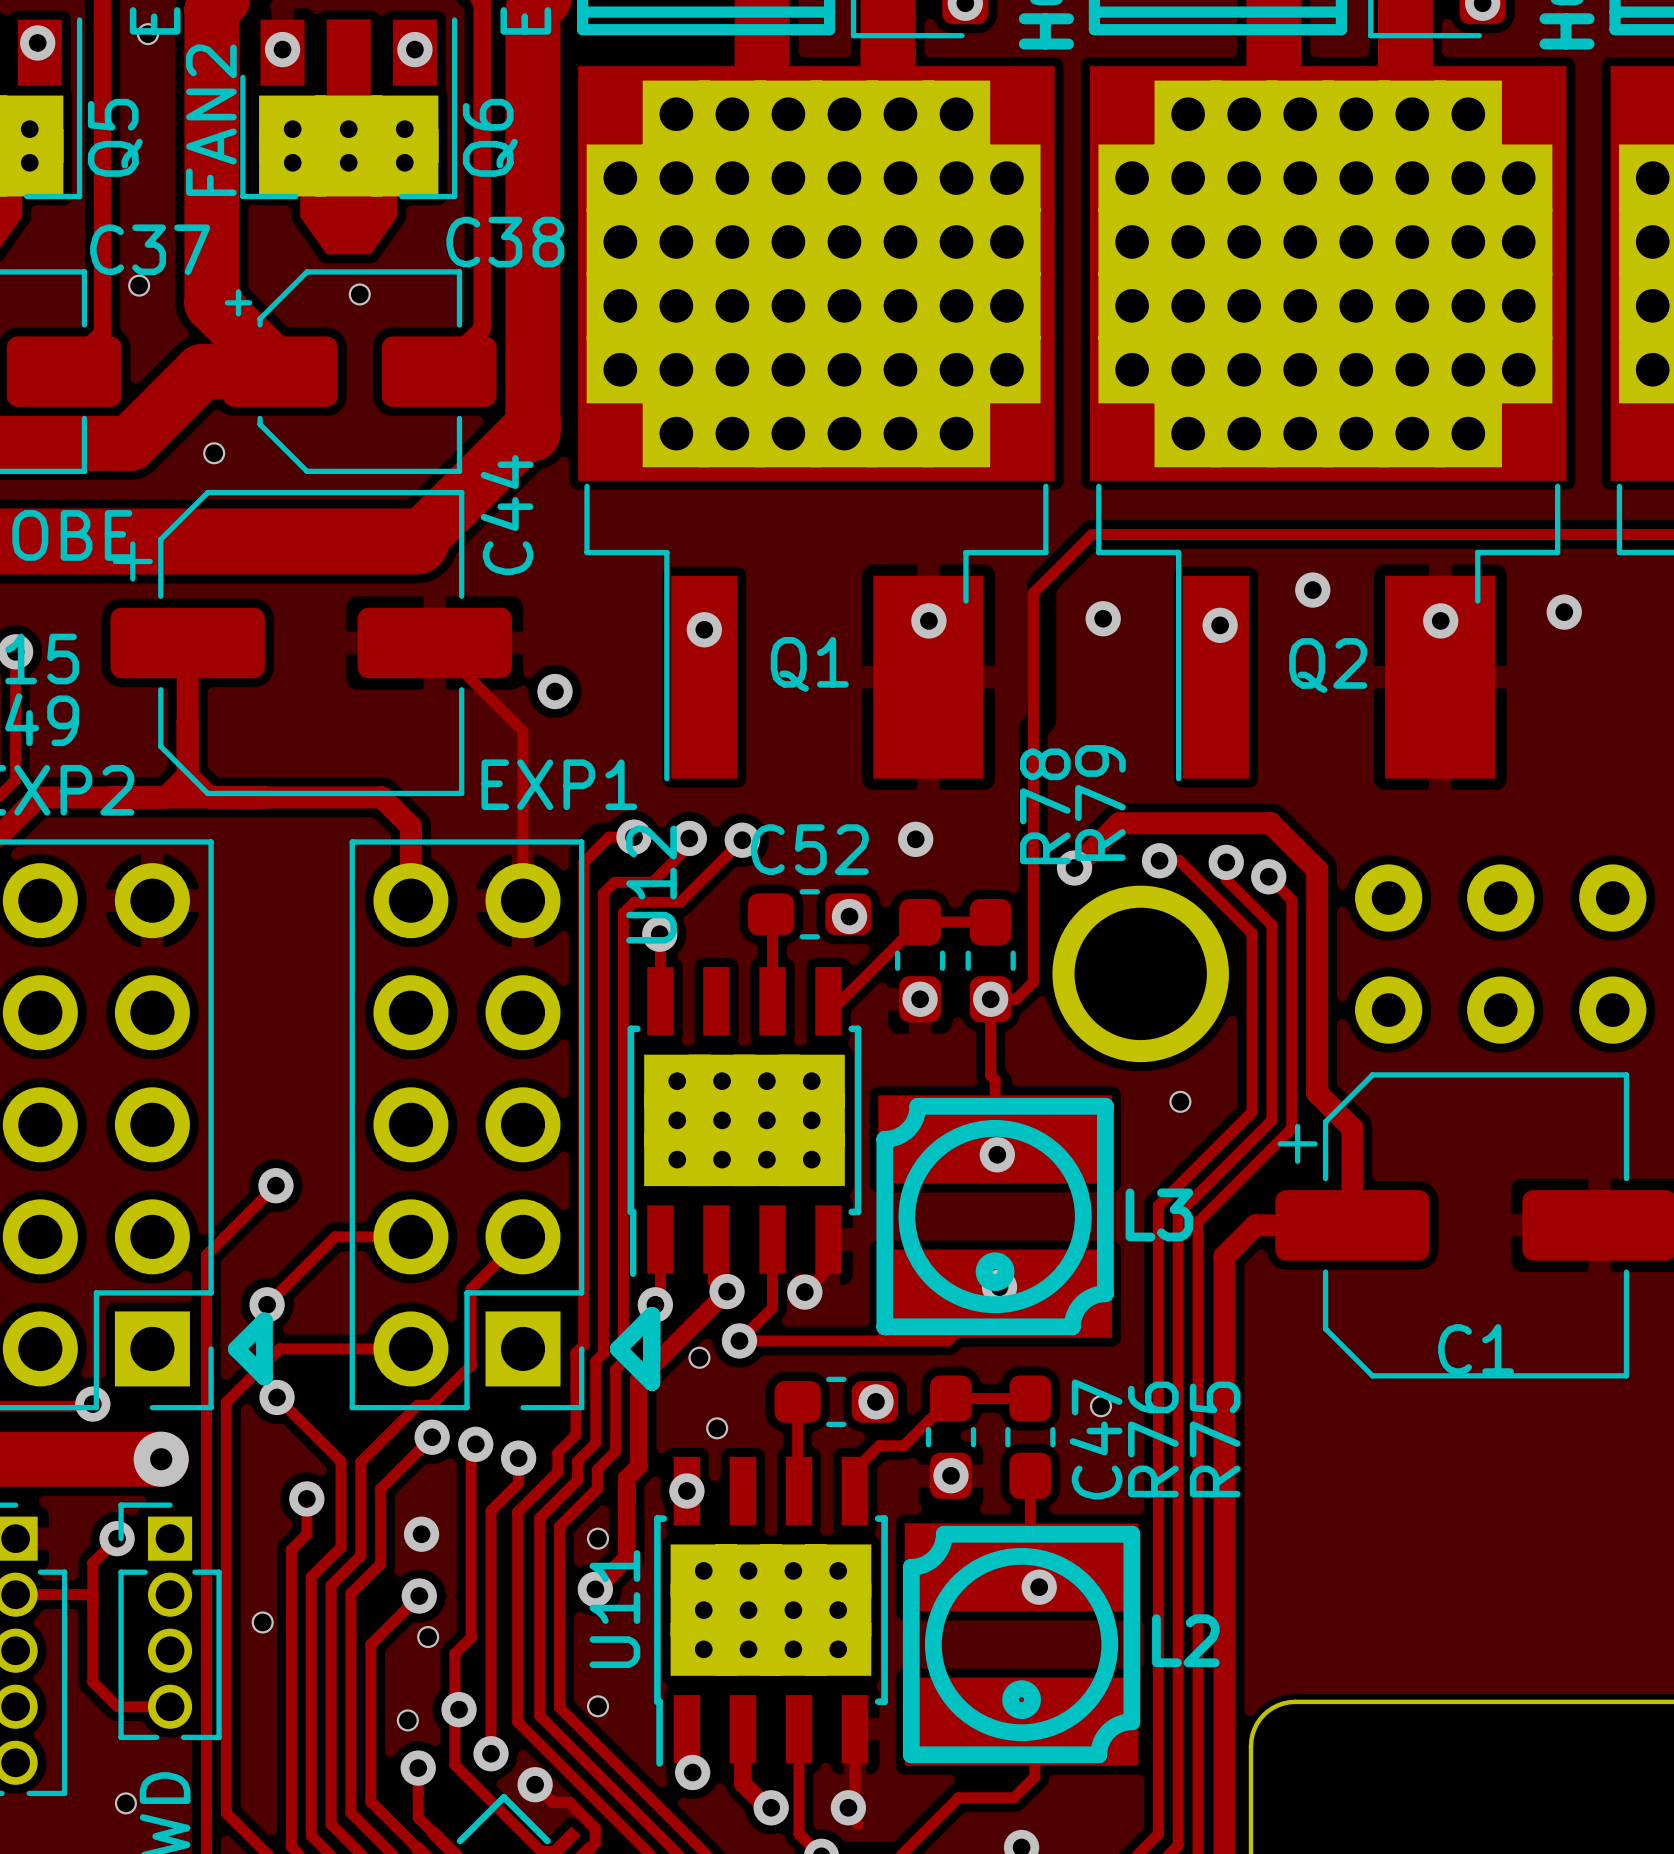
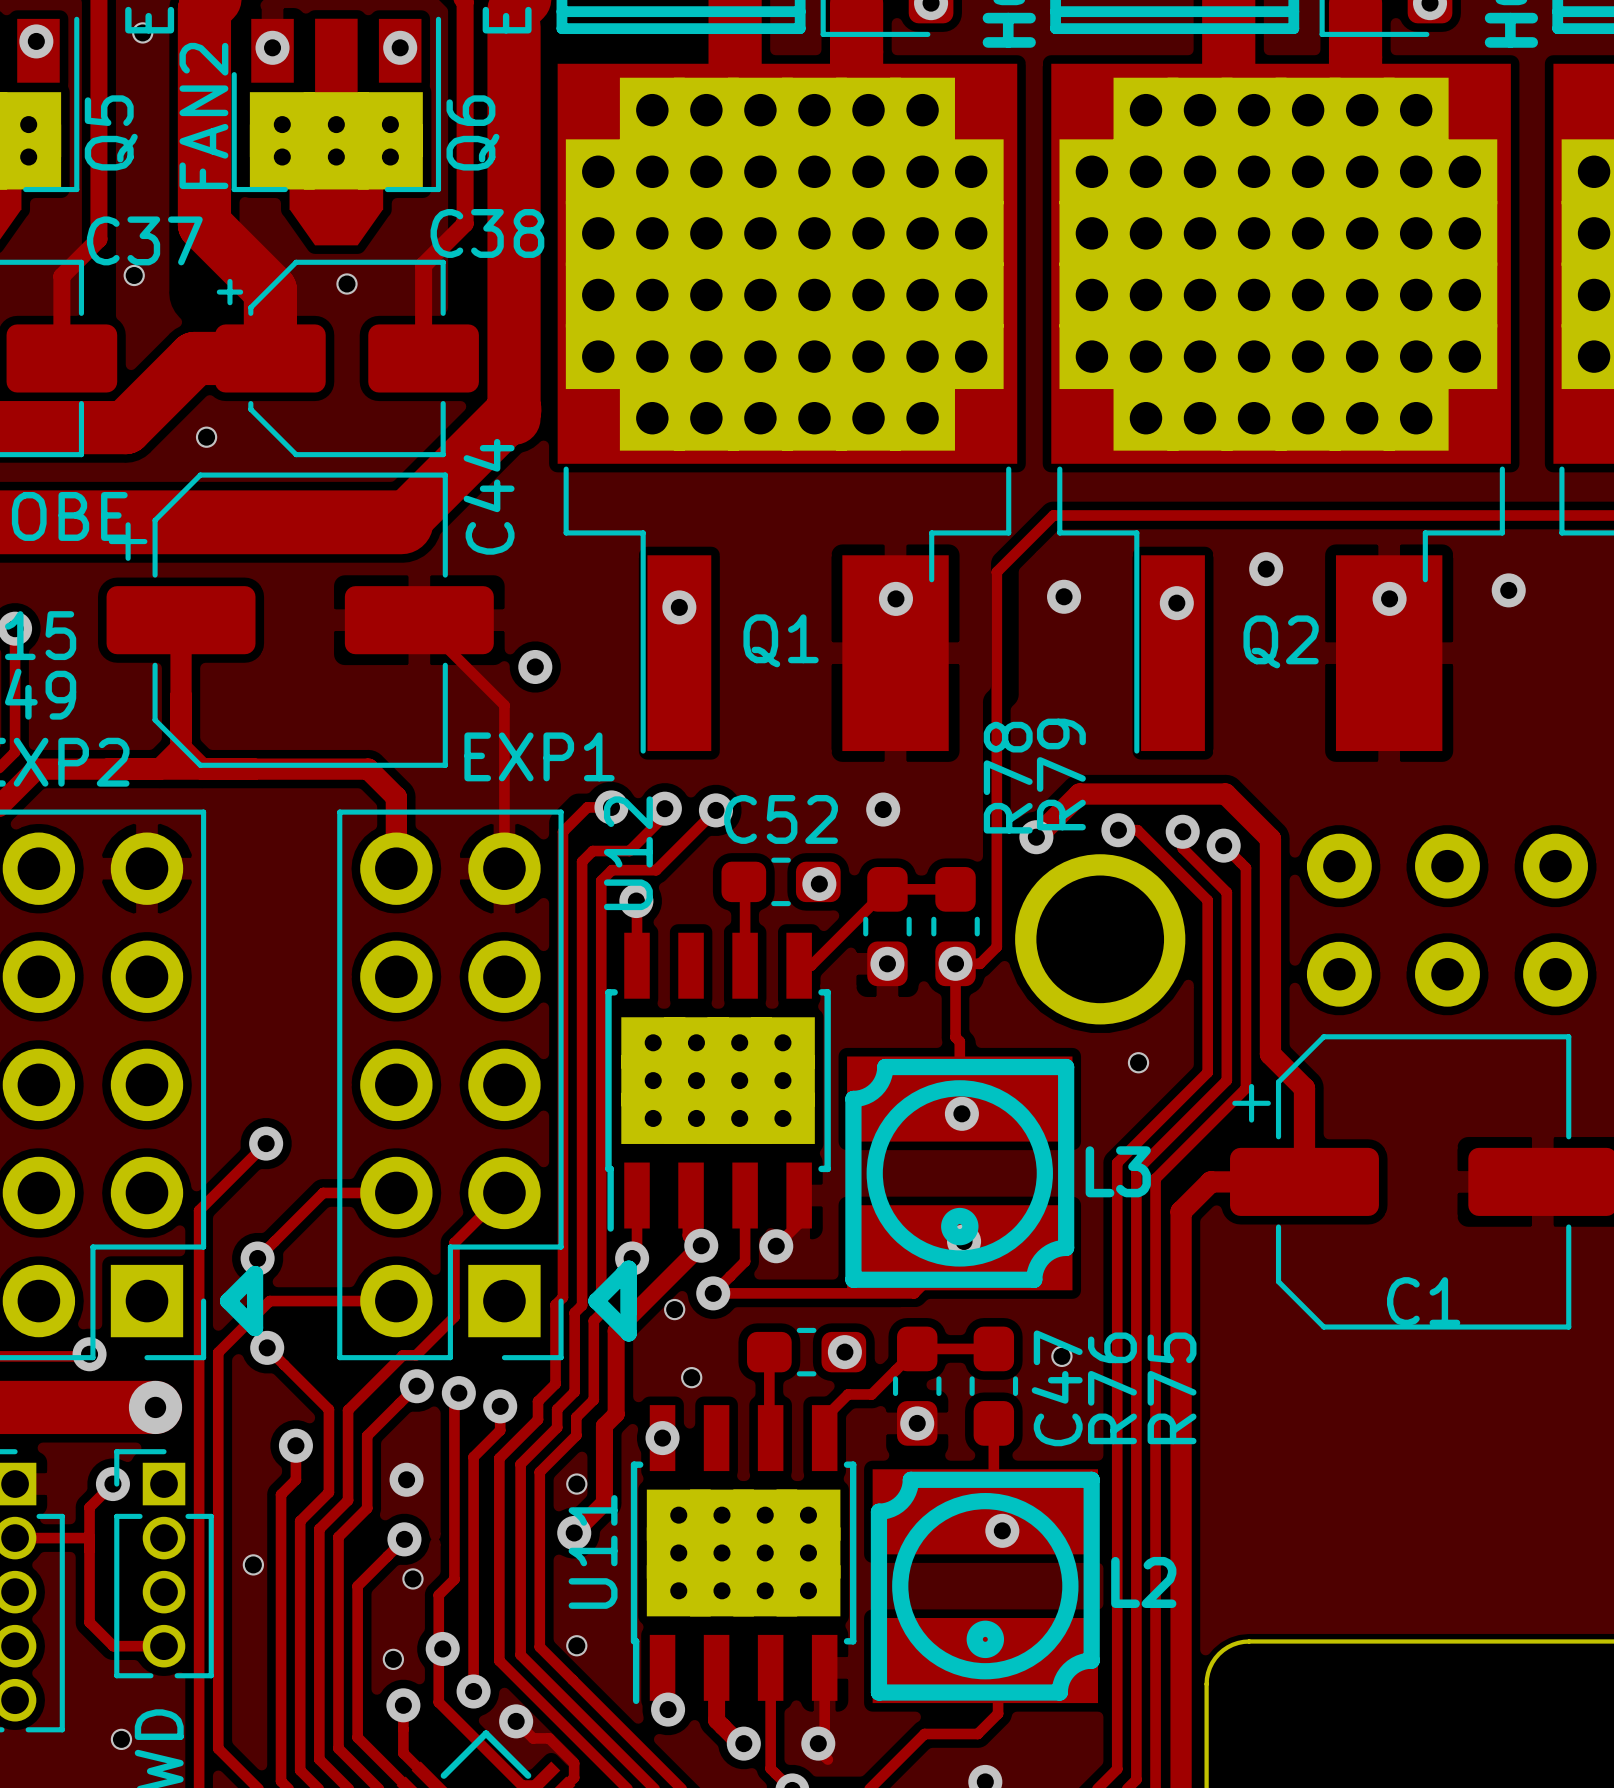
track: (211, 232) (211, 303) (280, 371) -> (204, 224) (270, 290) (270, 358)
track: (482, 232) (482, 328) (439, 371) -> (465, 223) (423, 265) (423, 358)
track: (102, 248) (102, 333) (64, 371) -> (98, 239) (61, 276) (61, 358)

